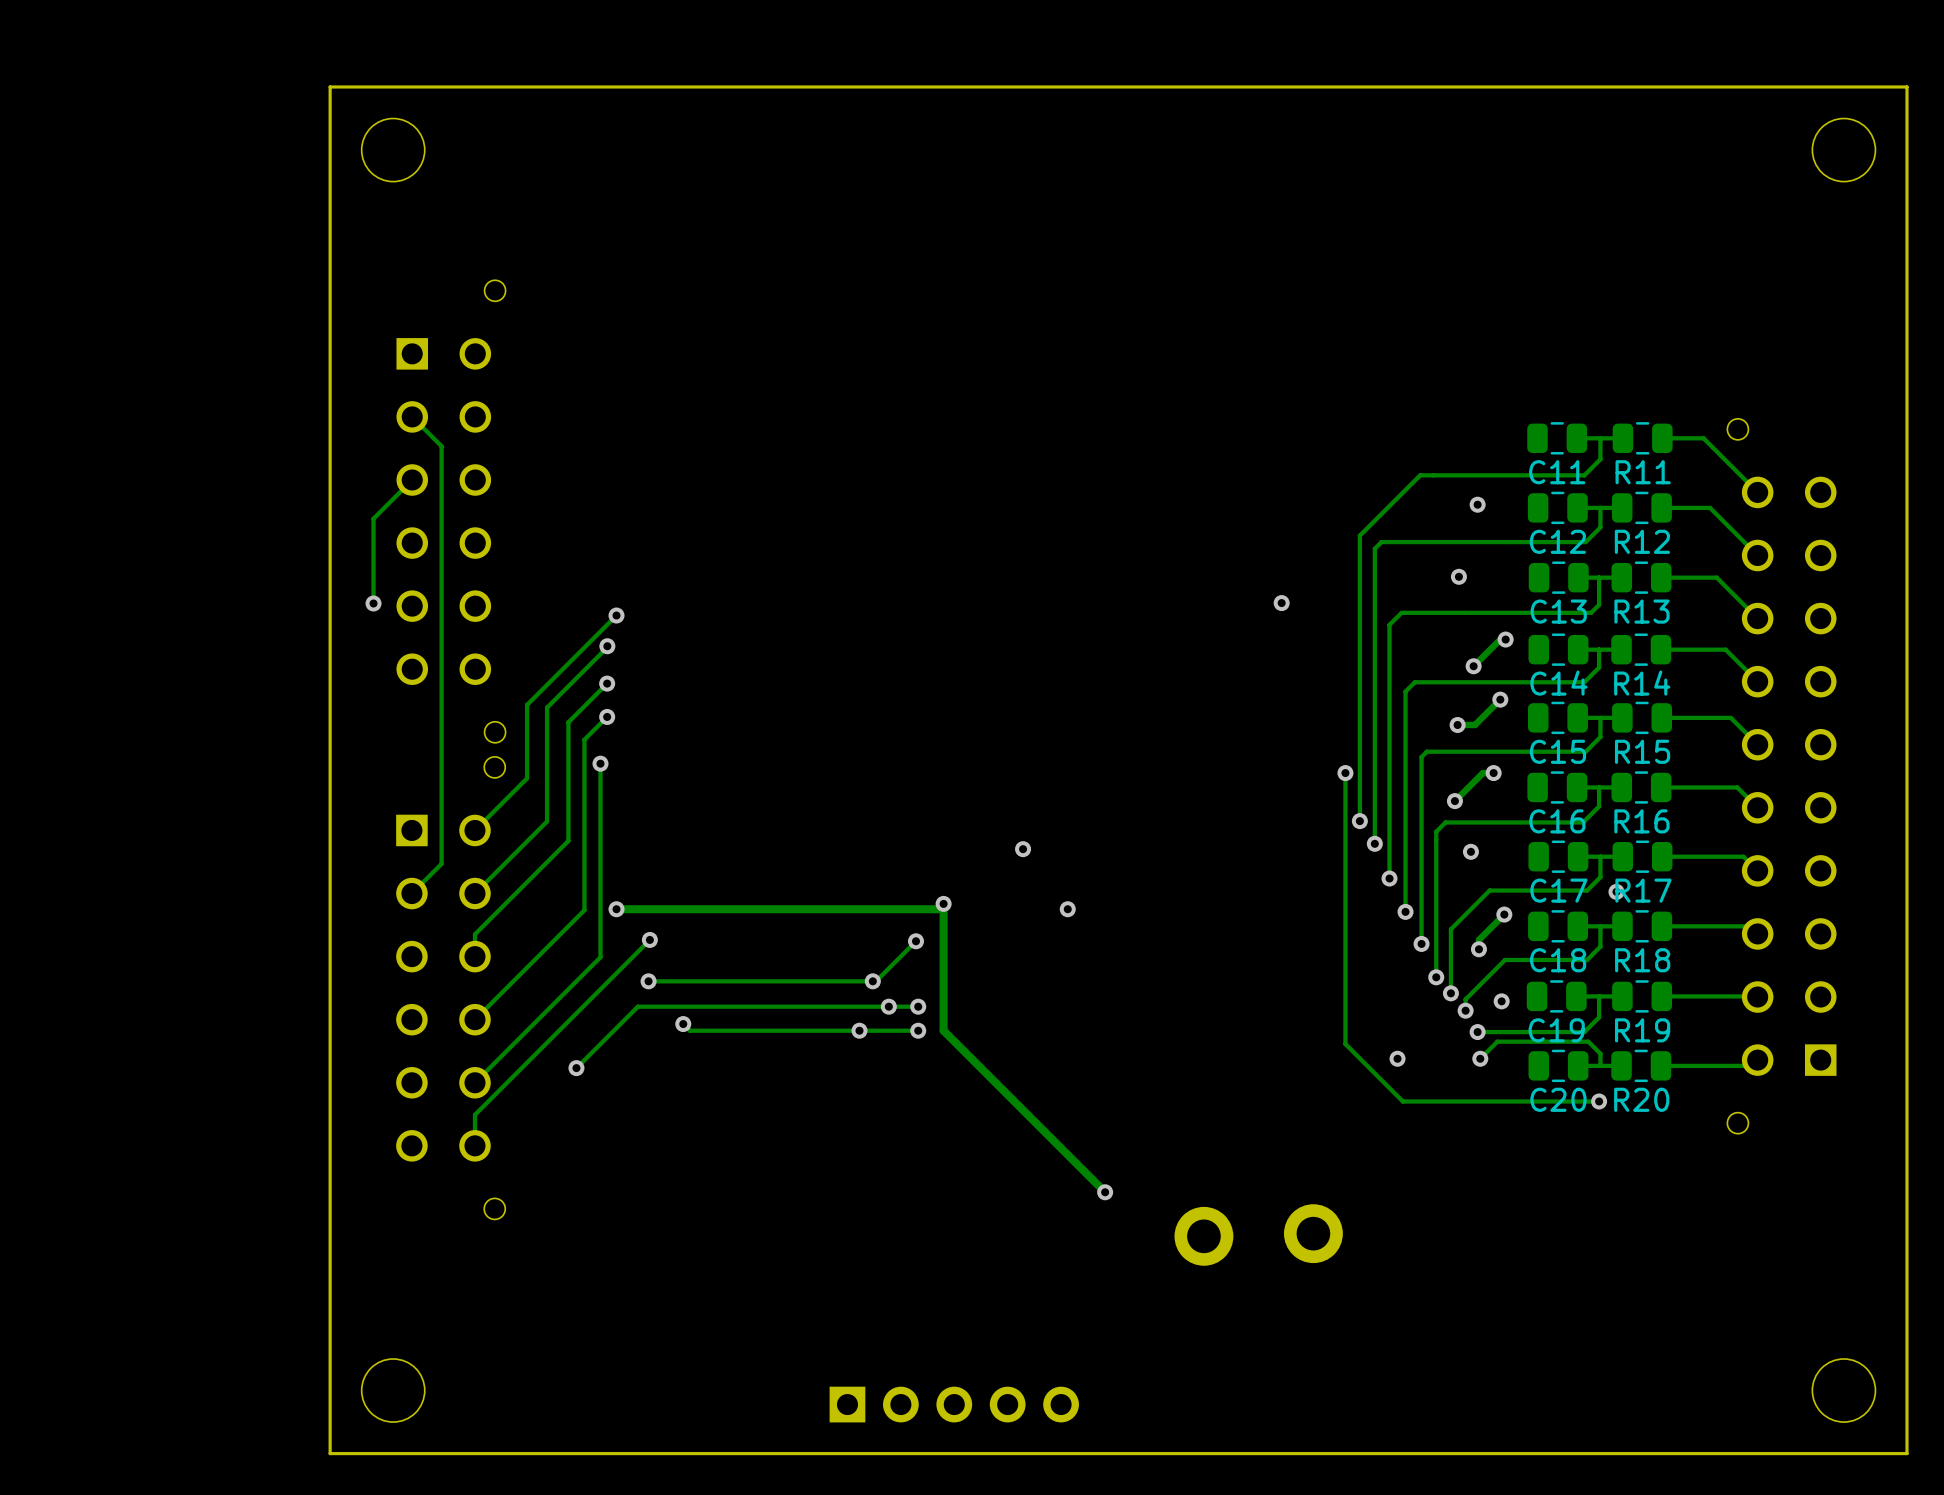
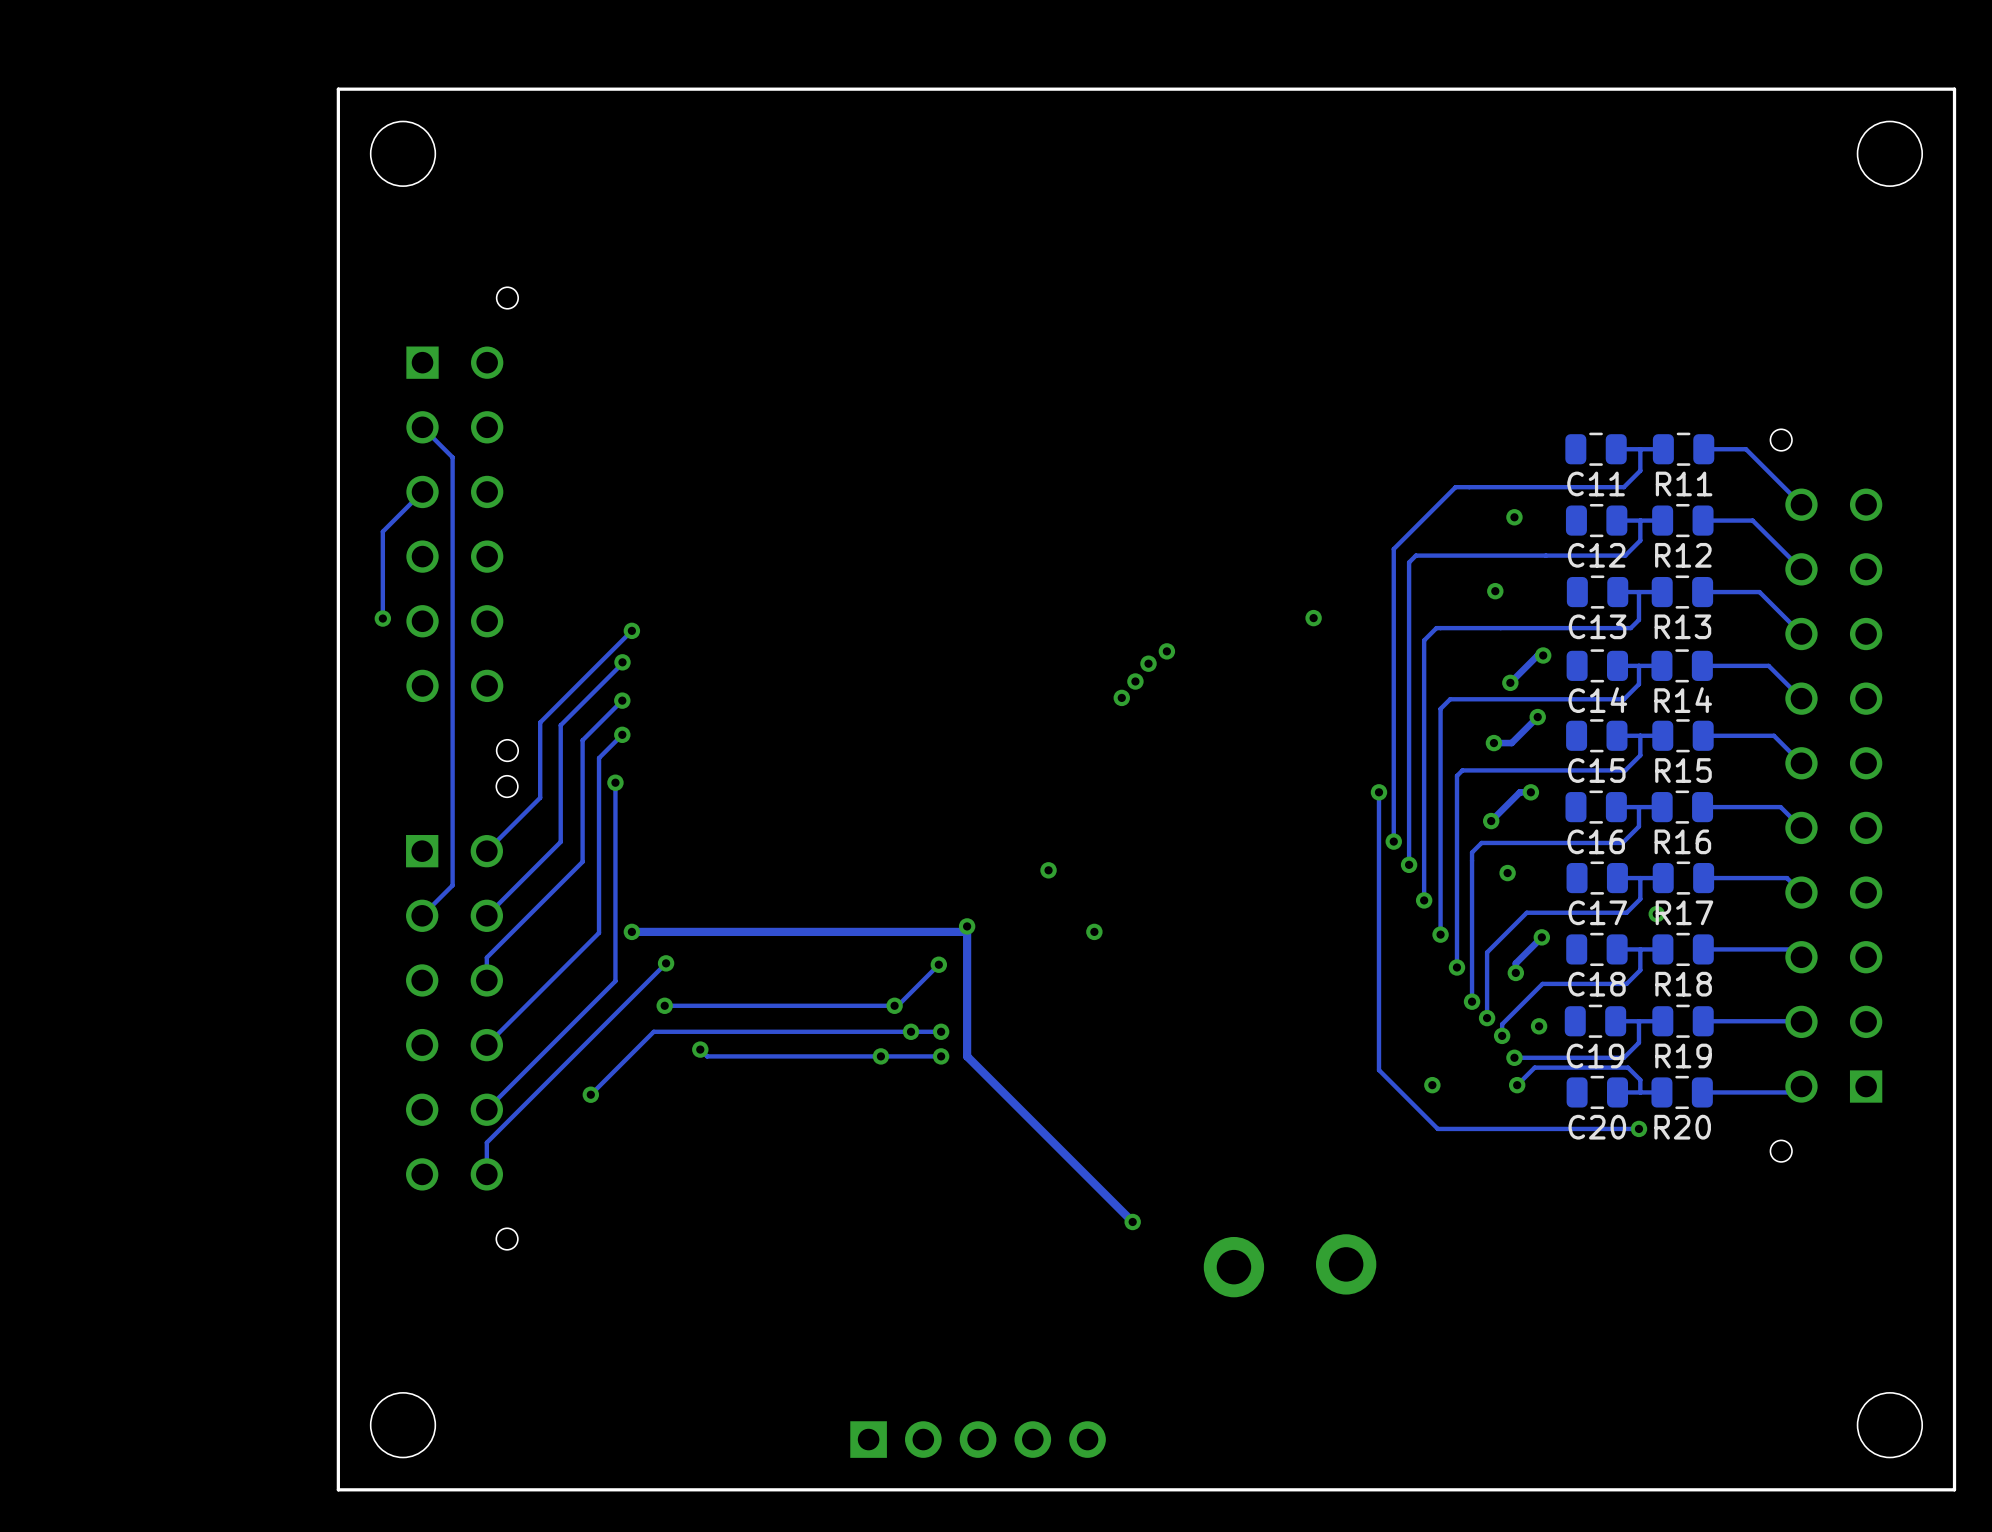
via: none -> (1166, 651)
via: none -> (1148, 663)
via: none -> (1135, 681)
via: none -> (1121, 697)

